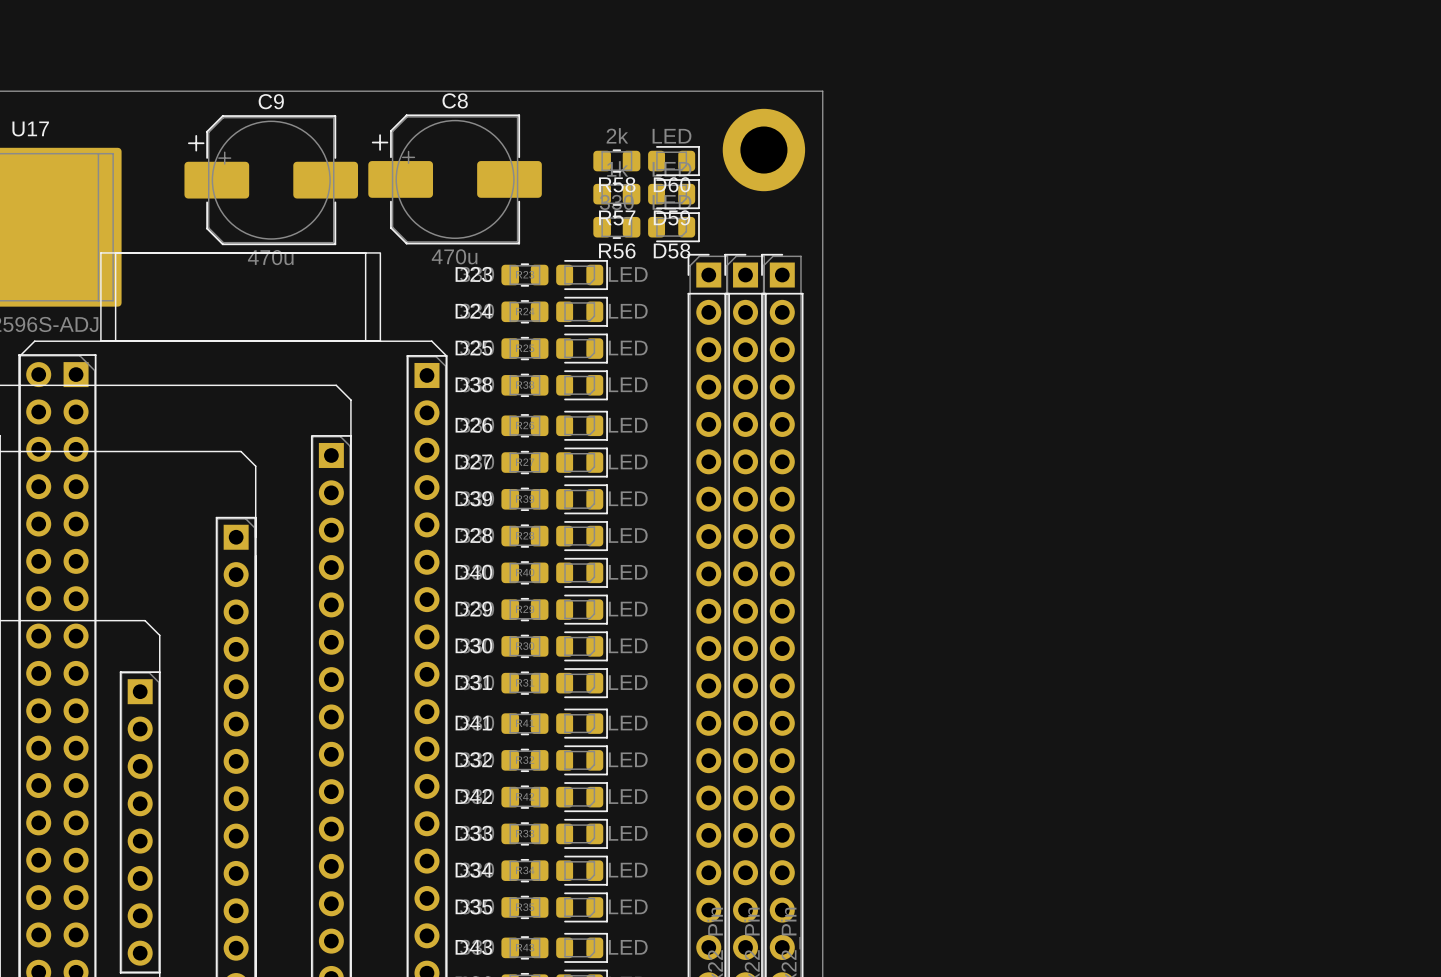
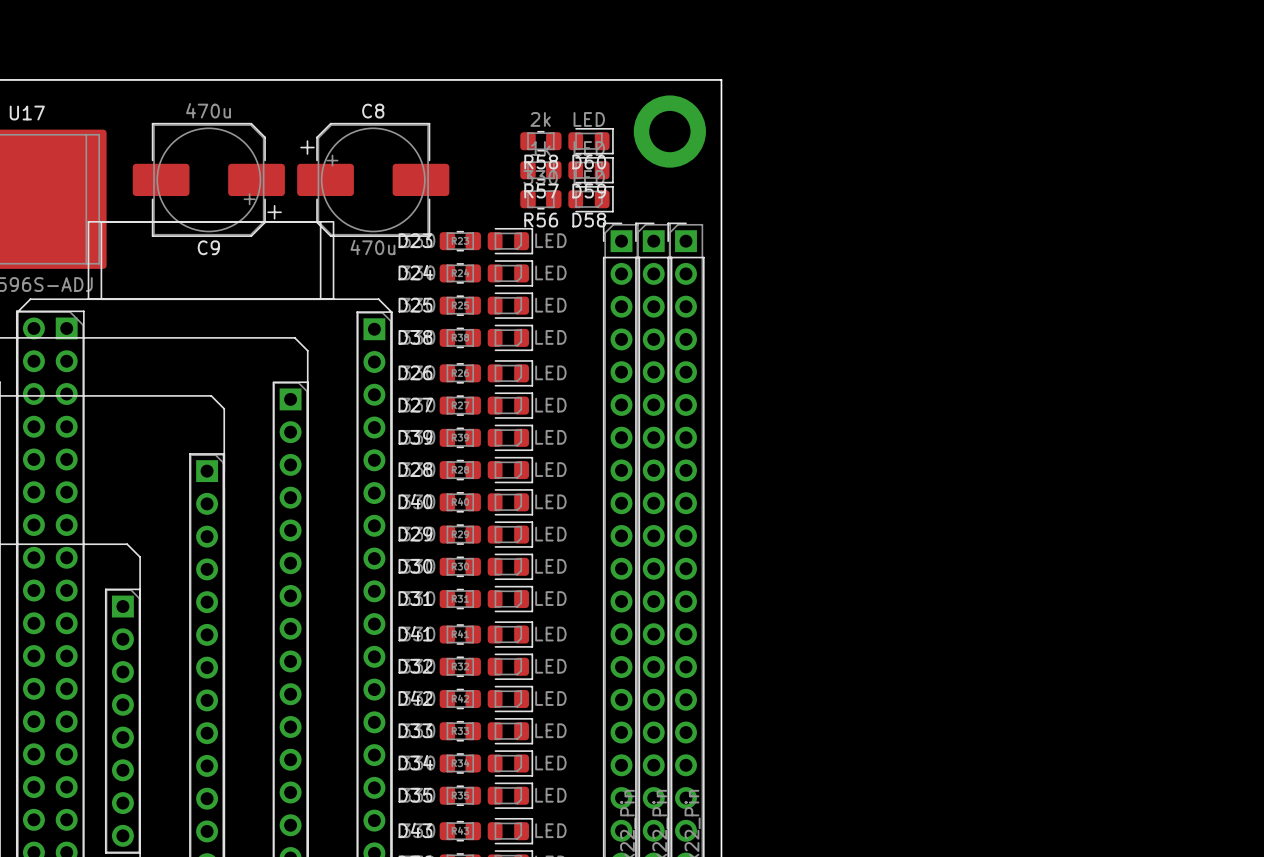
C8 position: (455, 179) -> (373, 179)
C9 rotation: 0° (271, 180) -> 180° (208, 179)

